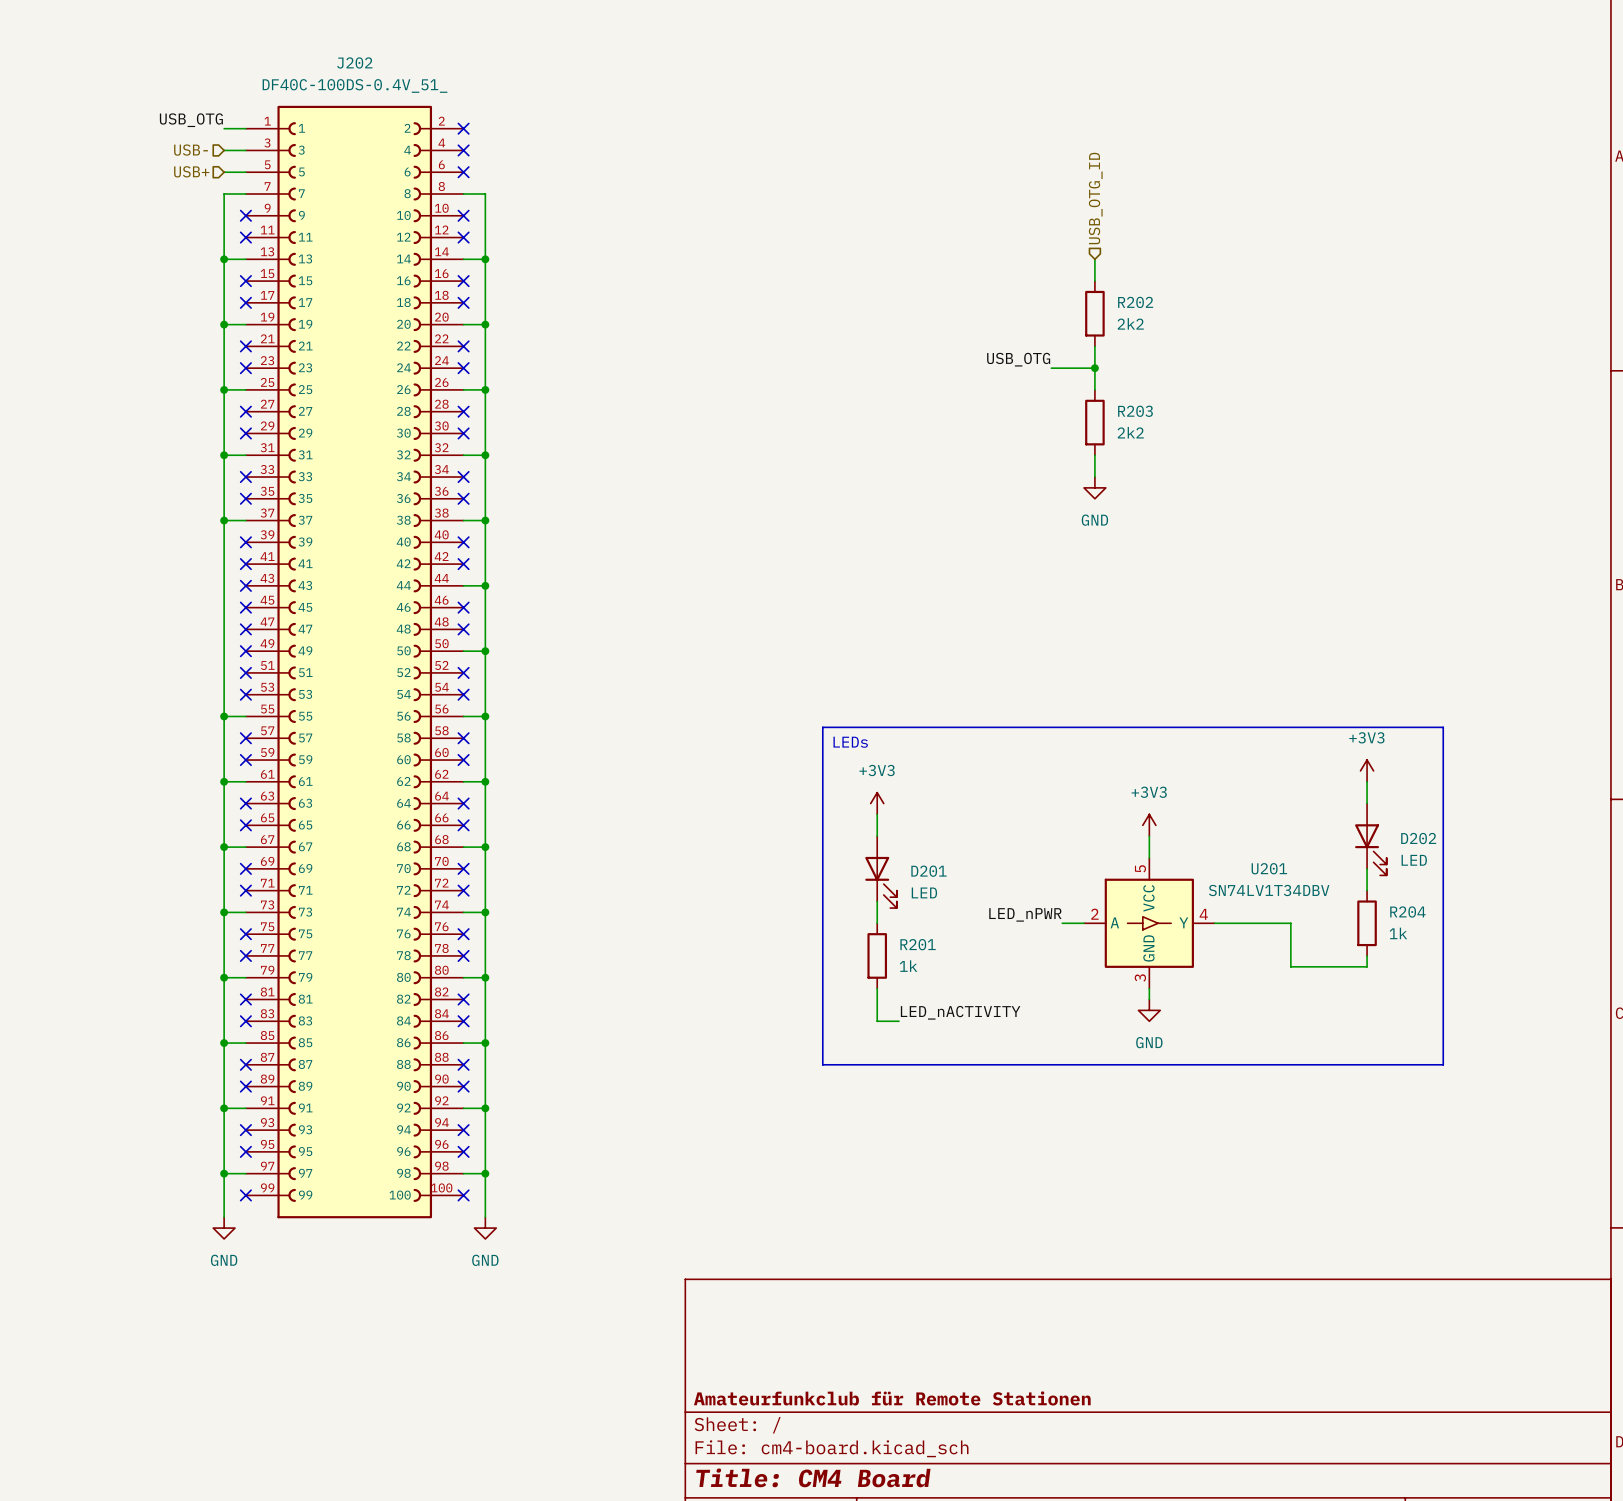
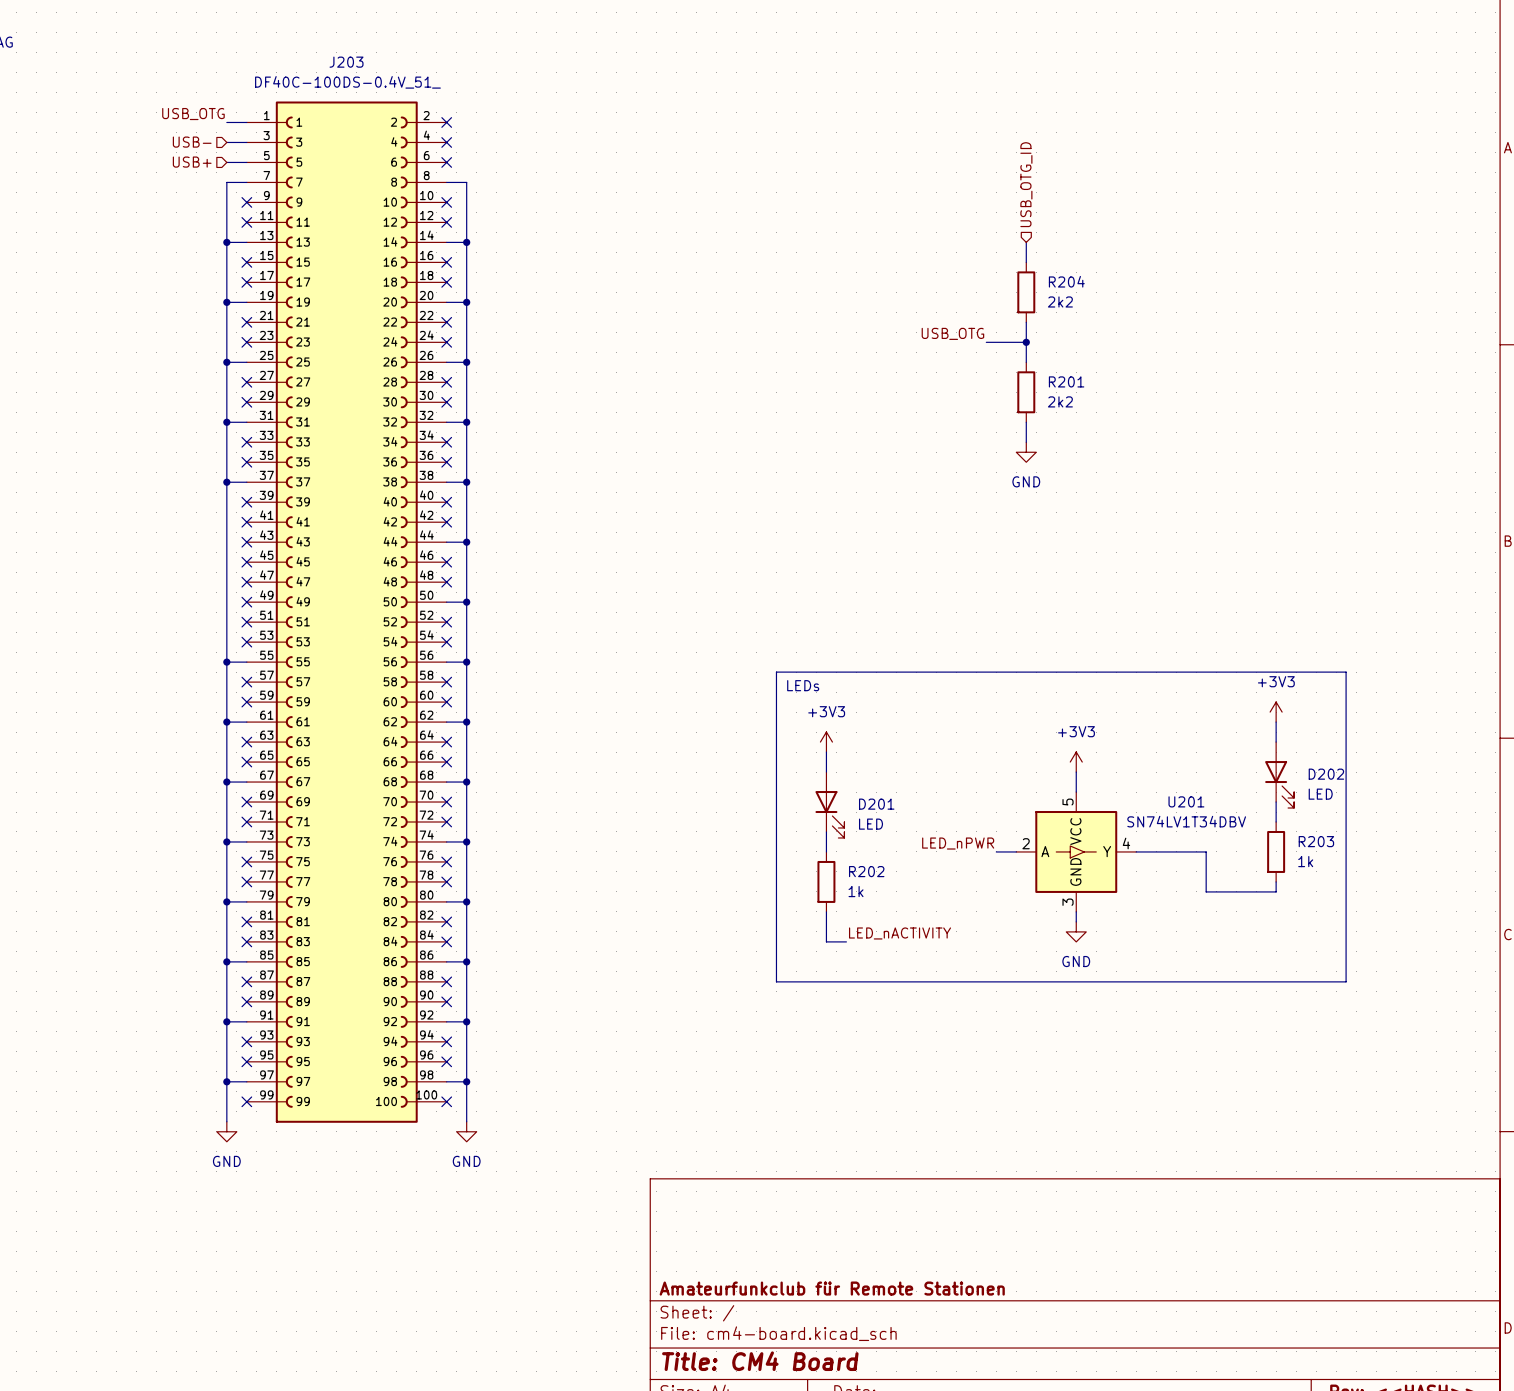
J202 name: J202 (354, 62) -> J203 (346, 62)
R202 name: R202 (1135, 302) -> R204 (1066, 281)
R203 name: R203 (1135, 411) -> R201 (1066, 381)
R204 name: R204 (1407, 912) -> R203 (1316, 841)
R201 name: R201 (918, 944) -> R202 (866, 871)

